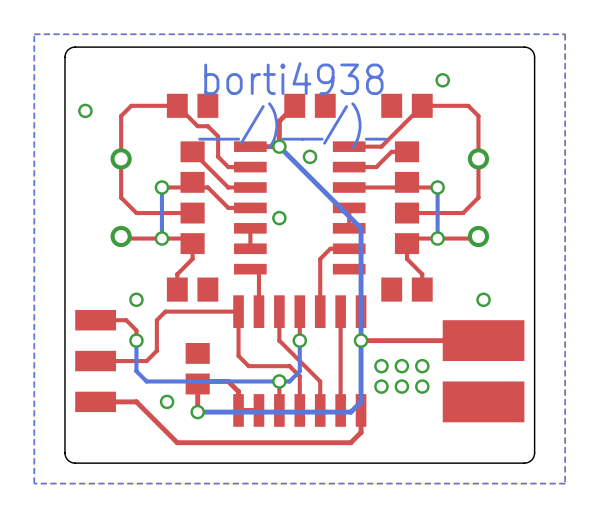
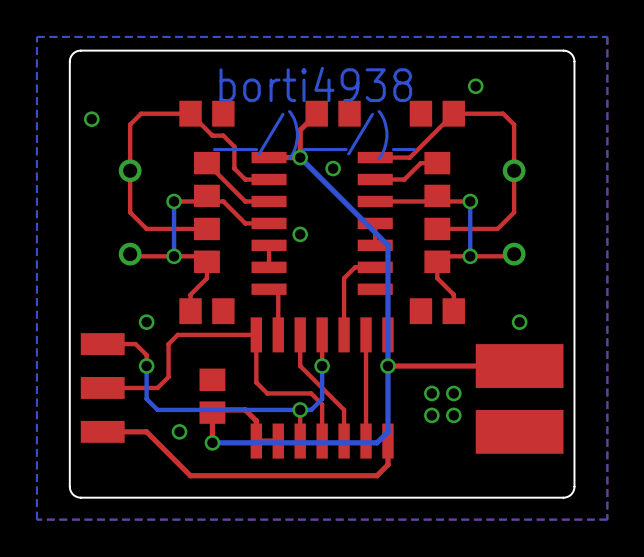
via: (381, 366) -> none
via: (381, 386) -> none

